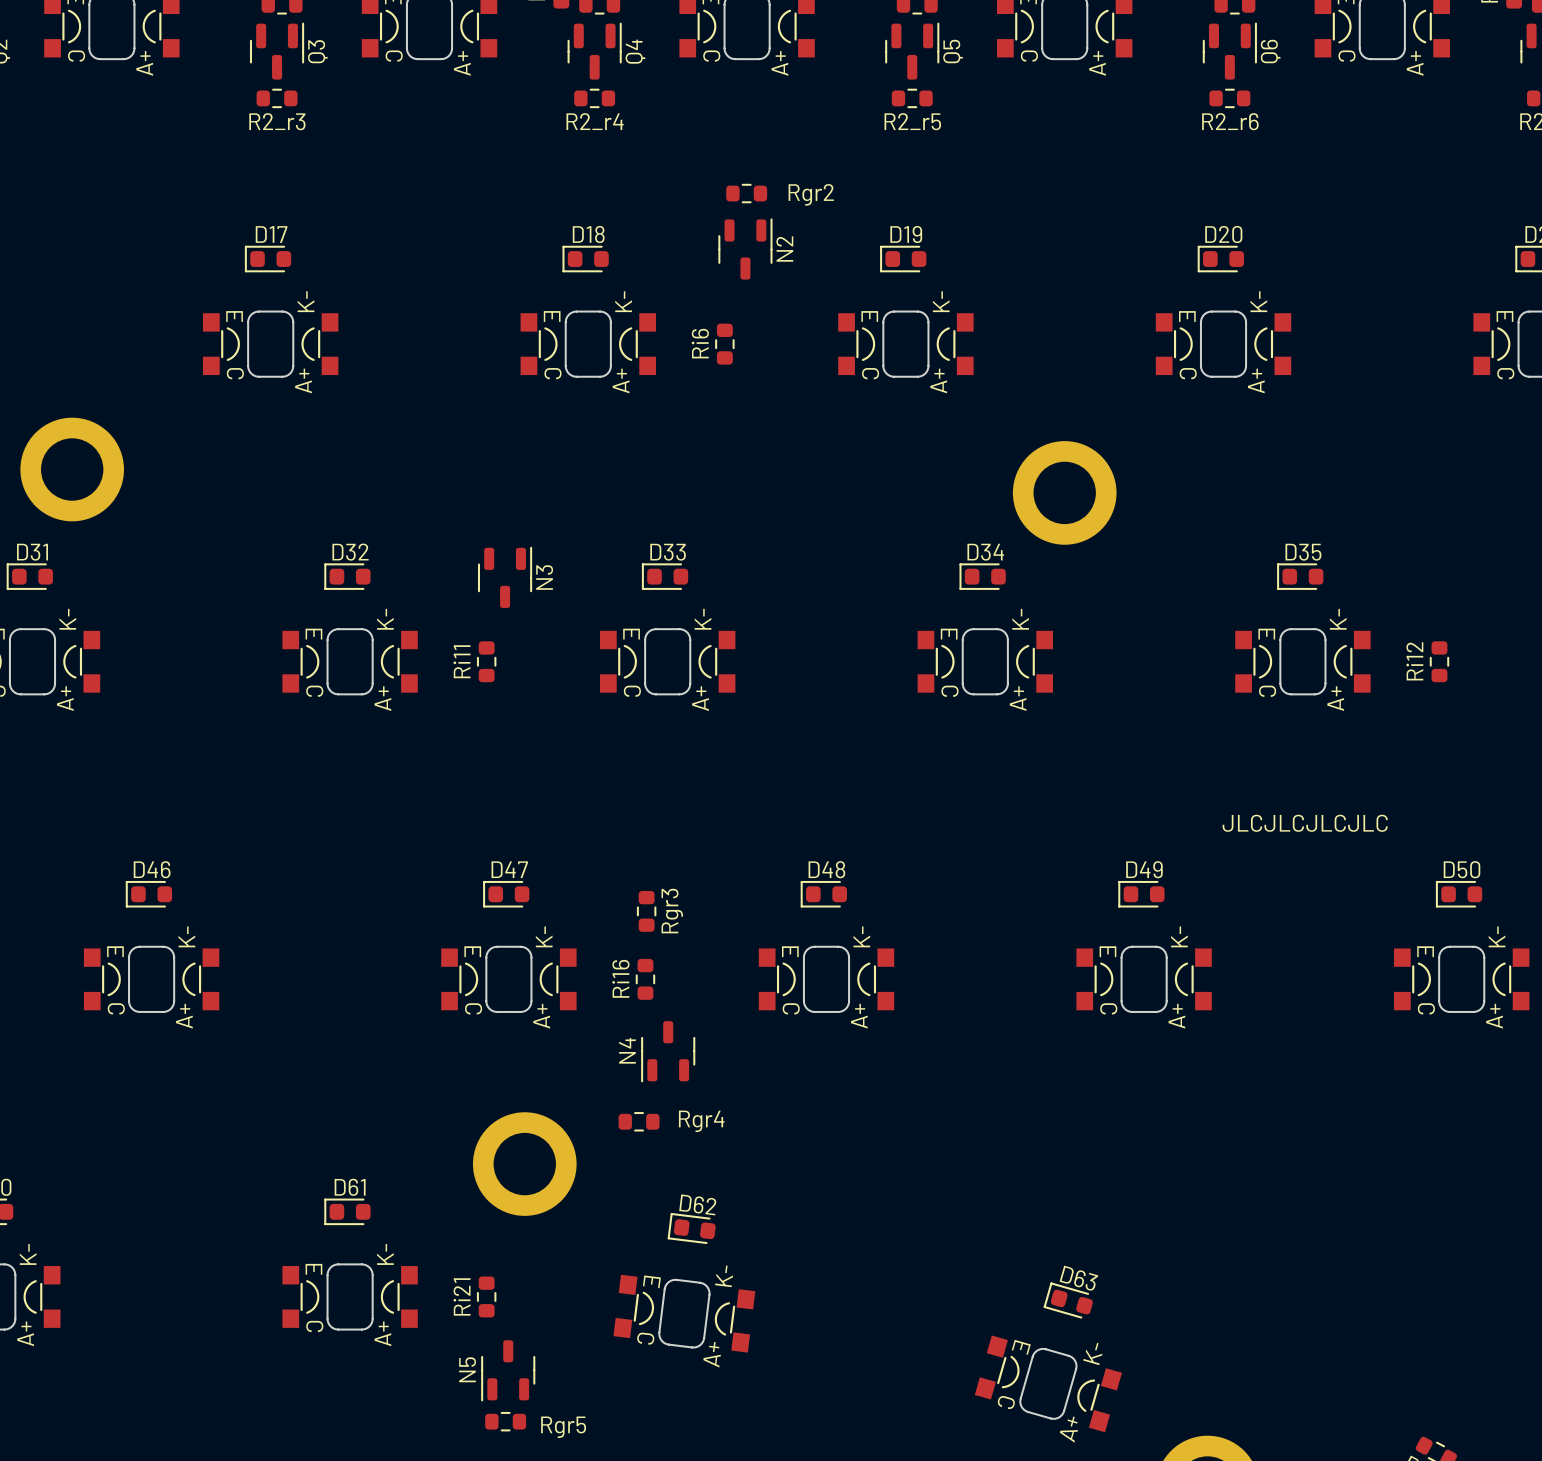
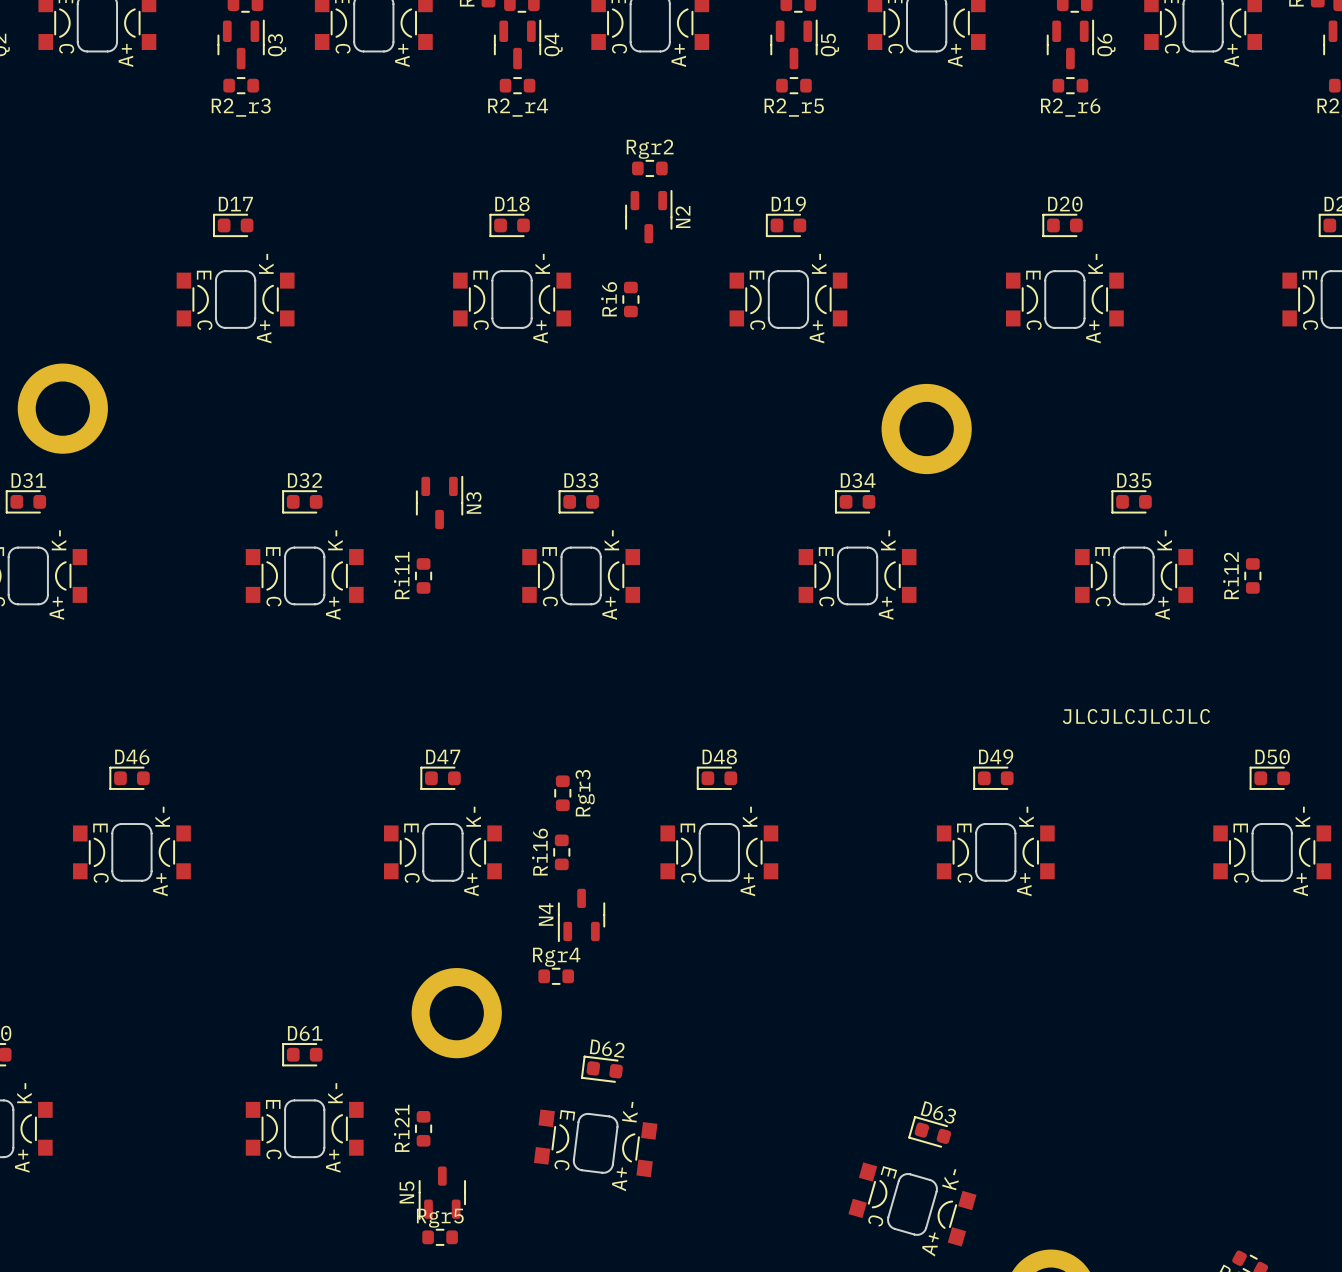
Rgr2 name position: Rgr2 (811, 194) -> Rgr2 (650, 149)
Rgr4 name position: Rgr4 (701, 1121) -> Rgr4 (556, 957)
Rgr5 name position: Rgr5 (563, 1427) -> Rgr5 (440, 1218)

